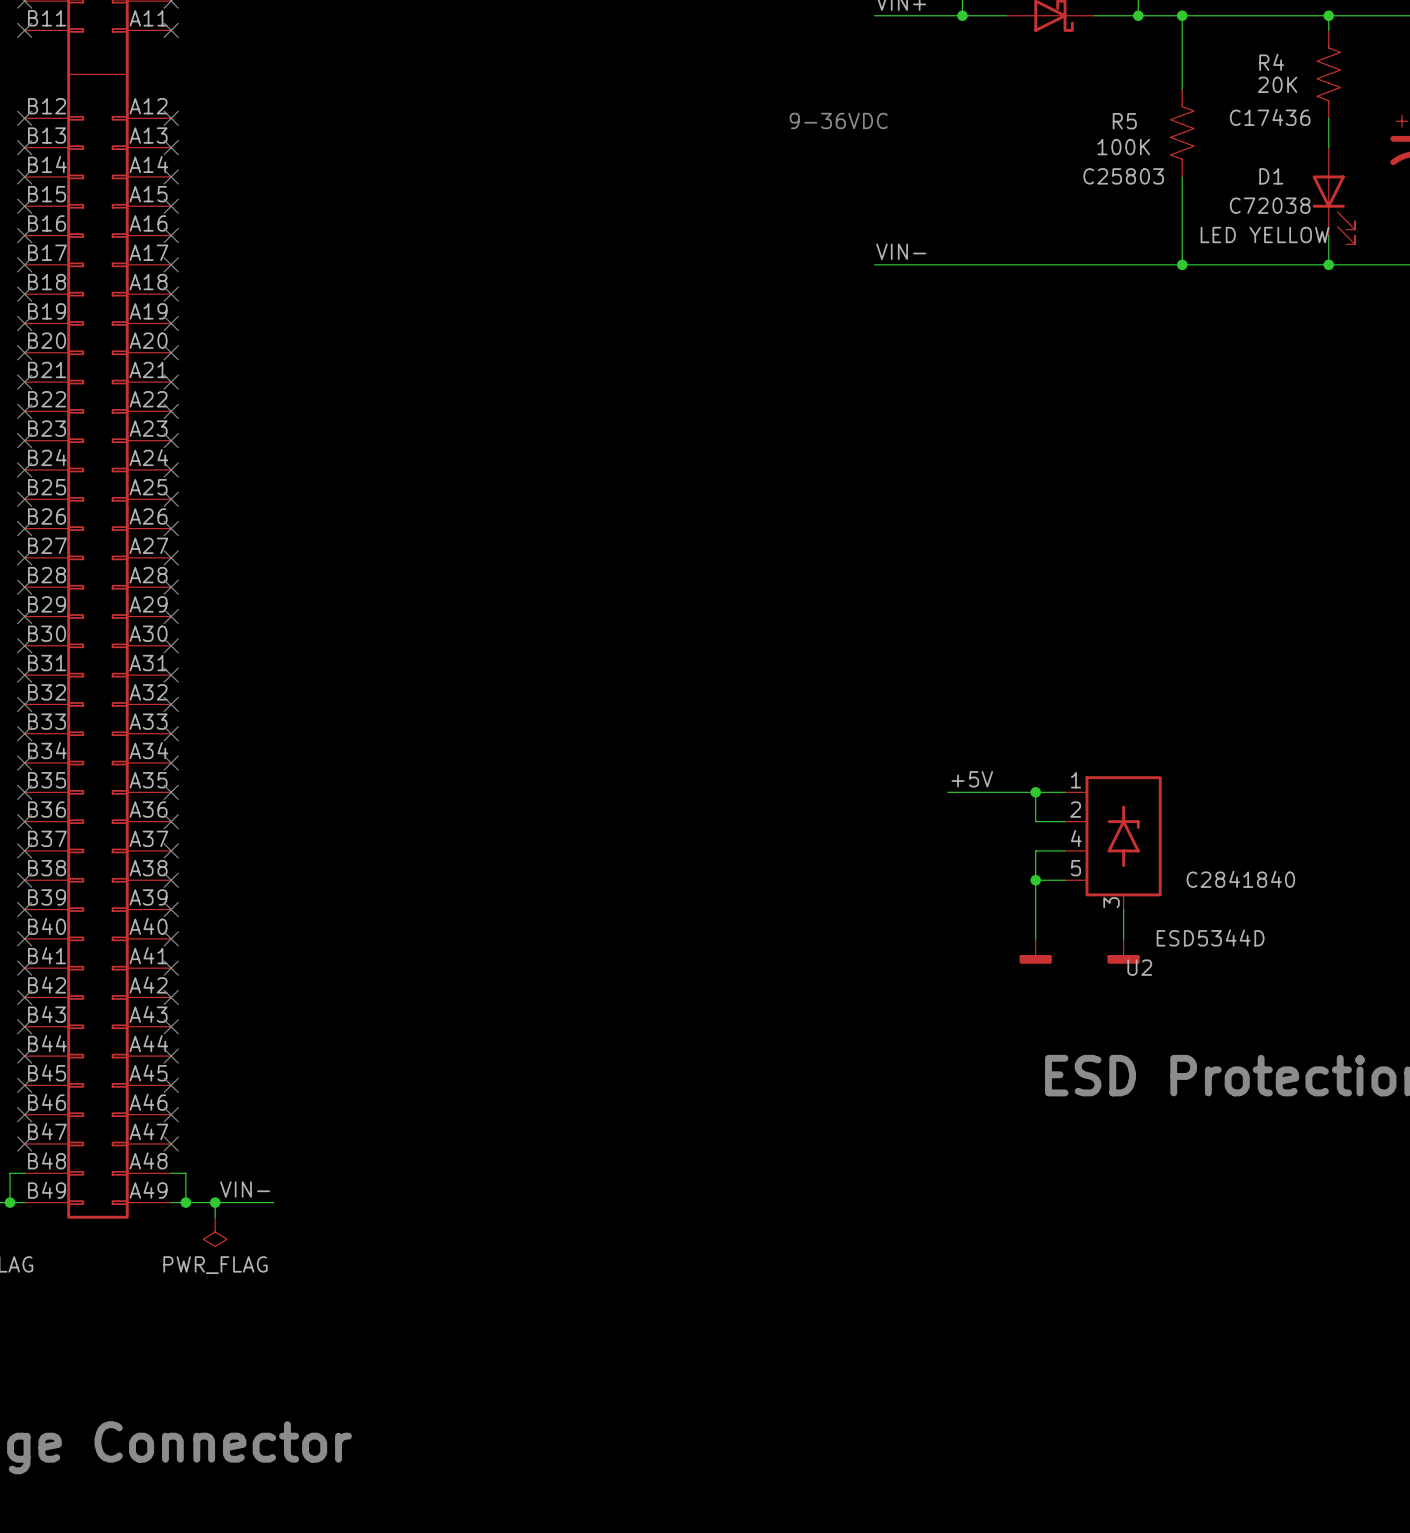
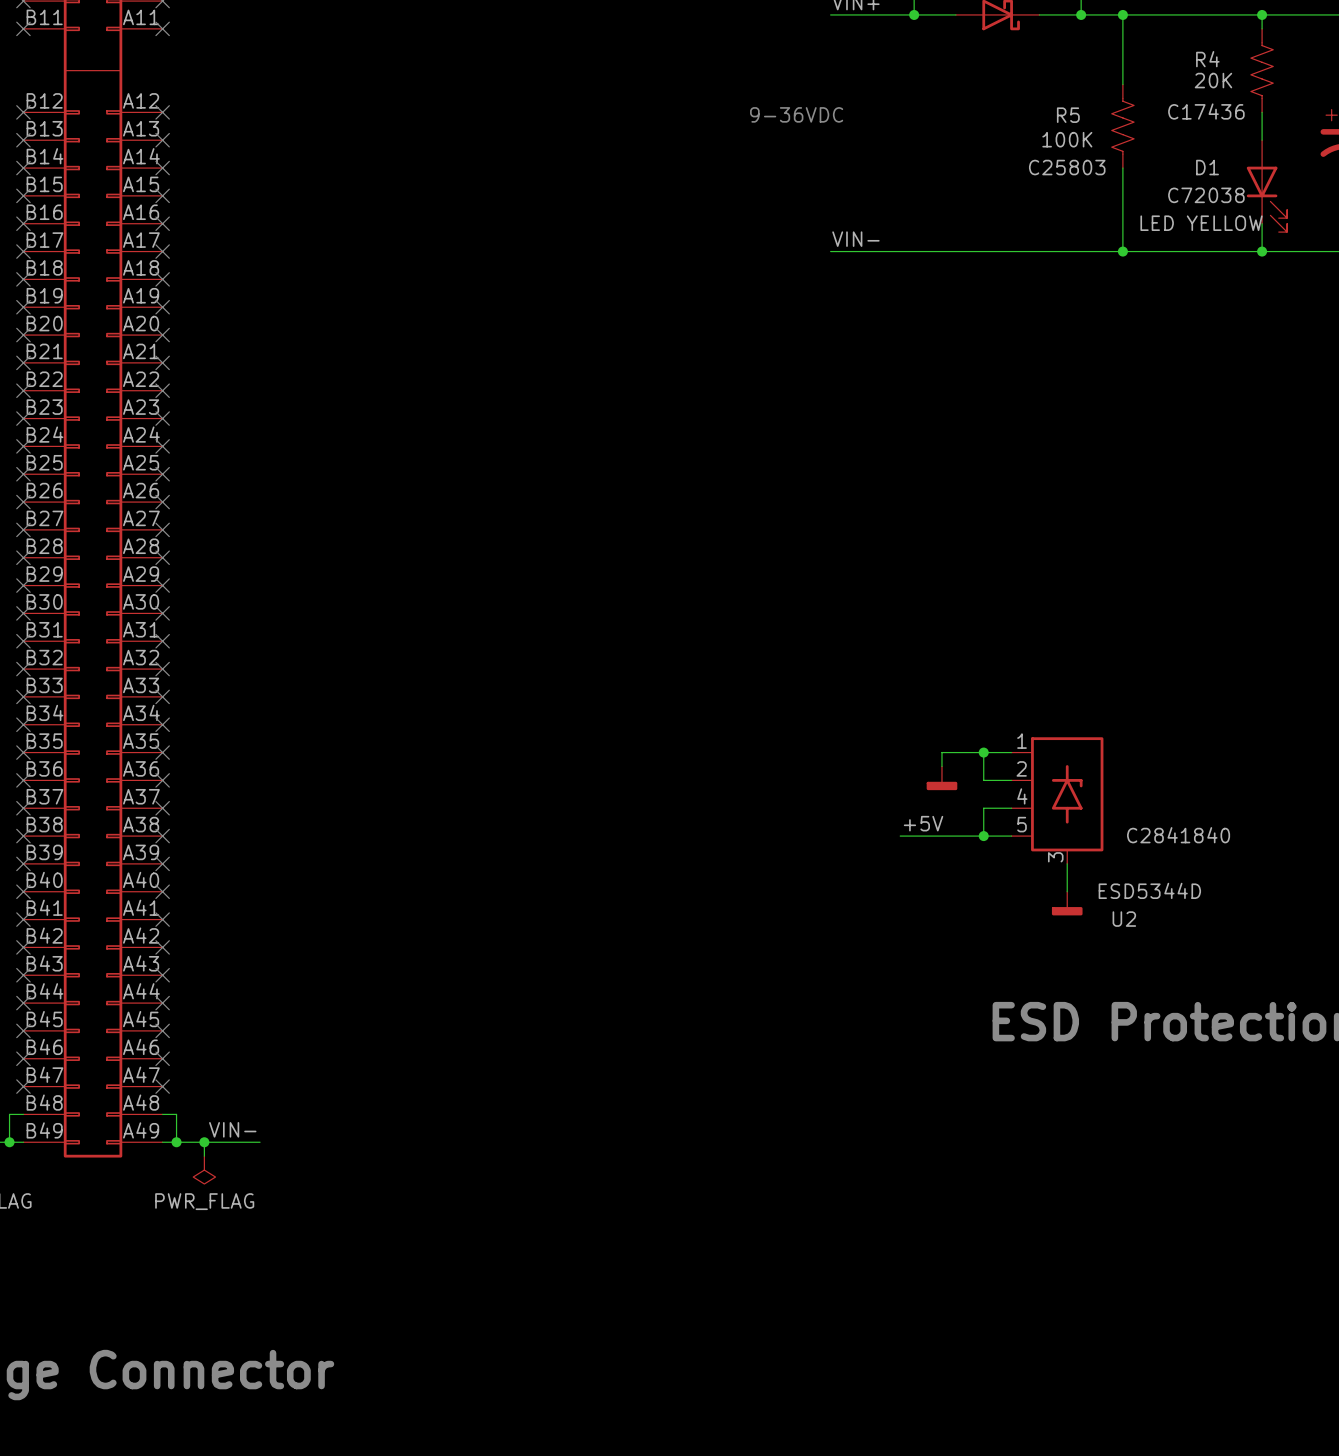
label position: +5V (972, 779) -> +5V (923, 823)
wire: (947, 792) (991, 792) -> (941, 766) (941, 752)
wire: (1035, 880) (1035, 938) -> (983, 836) (900, 836)
power symbol position: (1035, 951) -> (941, 778)
U2 name position: U2 (1139, 967) -> U2 (1124, 919)

